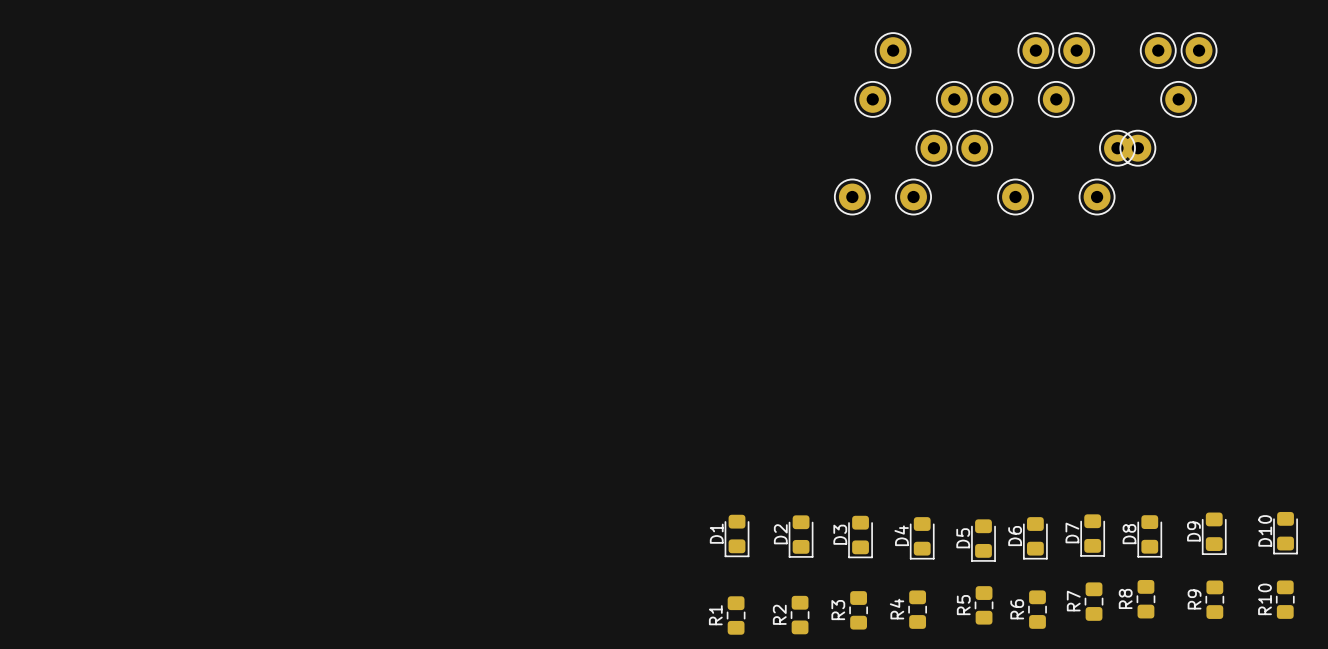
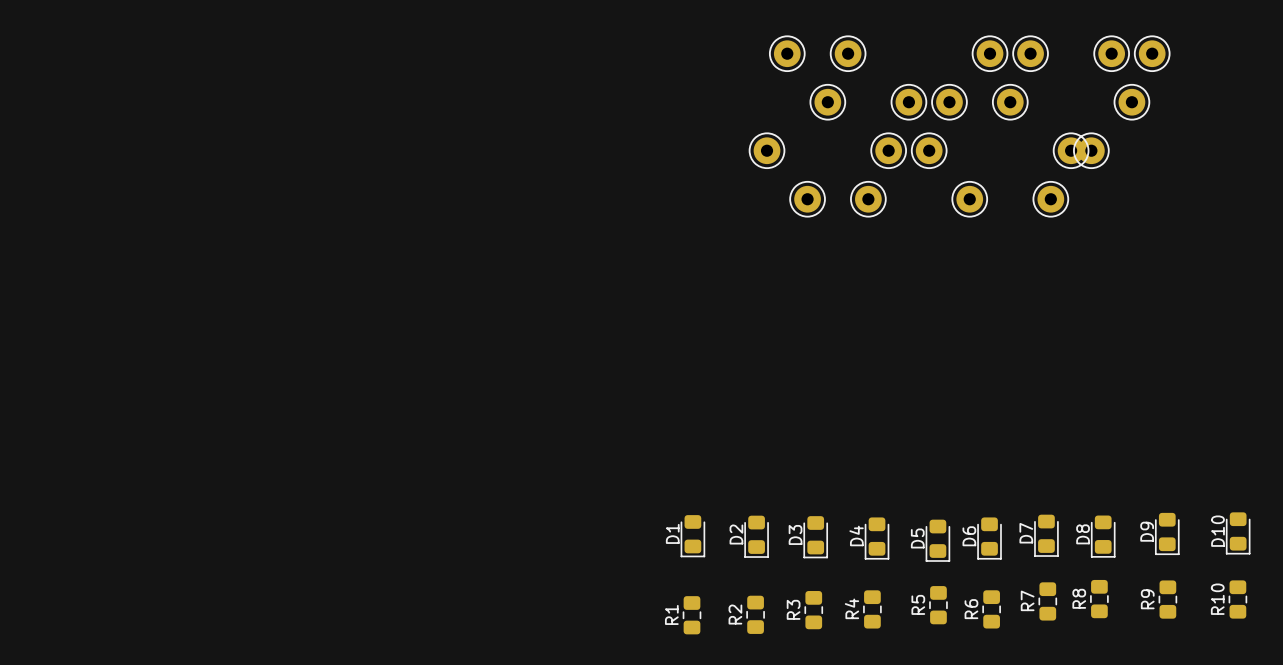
part: none -> (787, 53)
part: none -> (767, 150)

